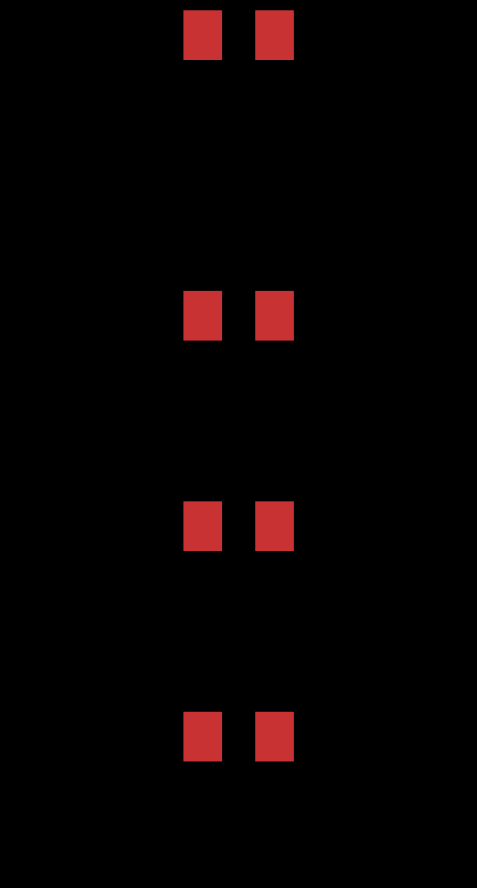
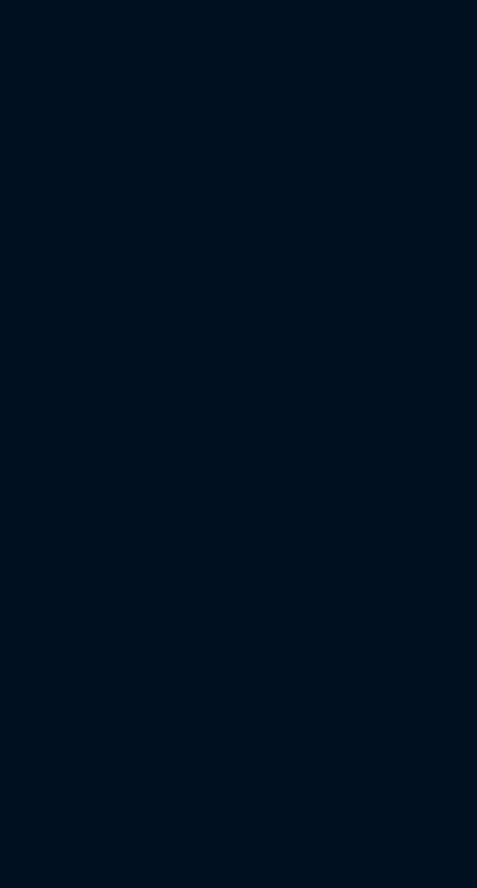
part: (238, 35) -> none
part: (238, 315) -> none
part: (238, 526) -> none
part: (238, 736) -> none

